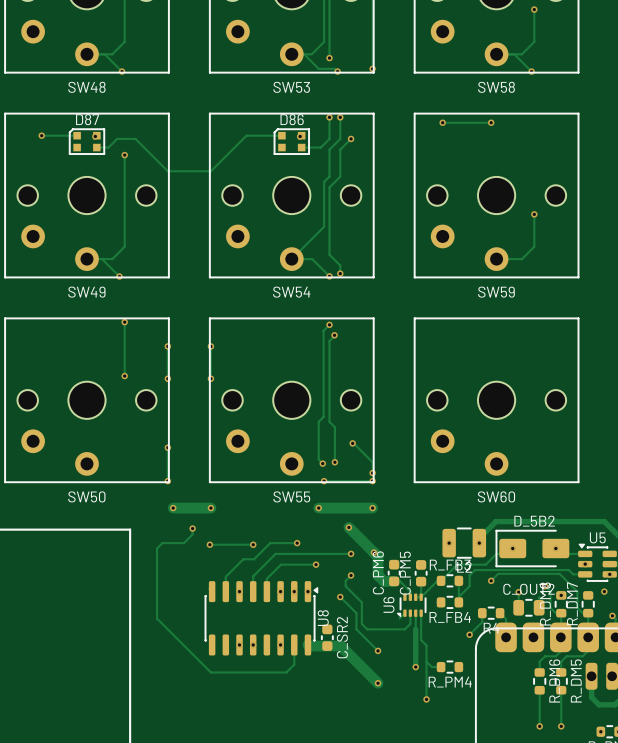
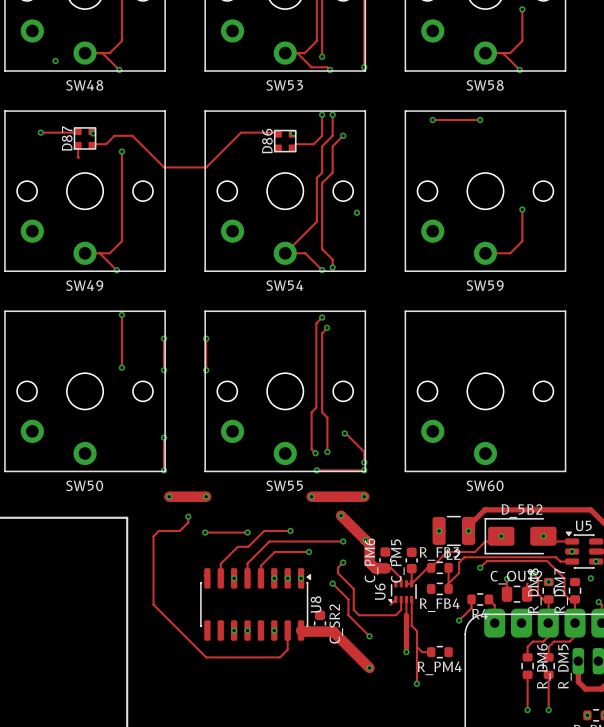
via: none -> (55, 60)
D87 name rotation: 0° (87, 119) -> 90° counterclockwise (67, 138)
D86 name rotation: 0° (292, 119) -> 90° counterclockwise (267, 141)
D87 footprint: [69, 128, 105, 155] -> [73, 127, 97, 150]
D86 footprint: [273, 128, 310, 155] -> [274, 130, 297, 153]
track: none -> (78, 145) (78, 157)
via: none -> (356, 212)

